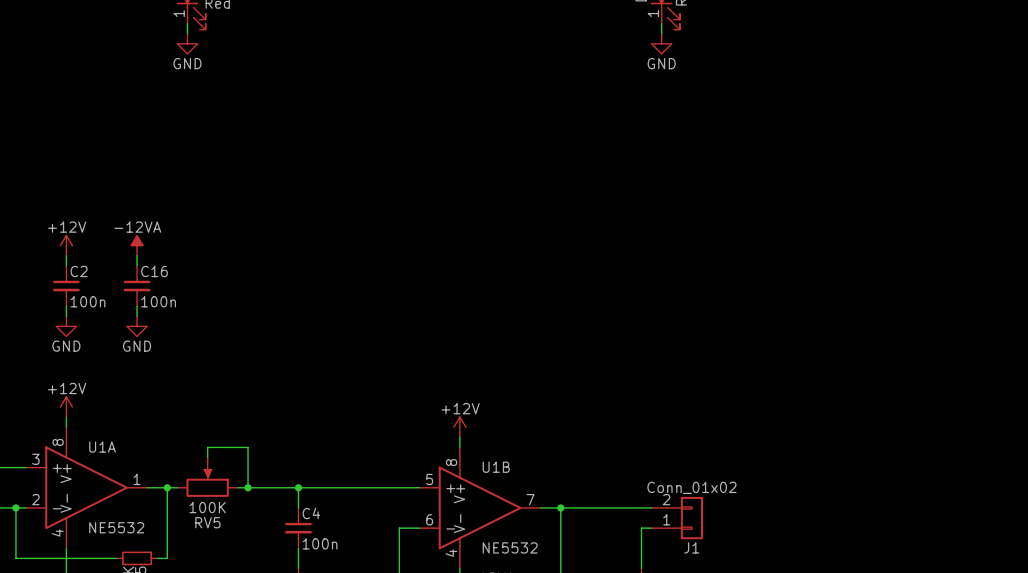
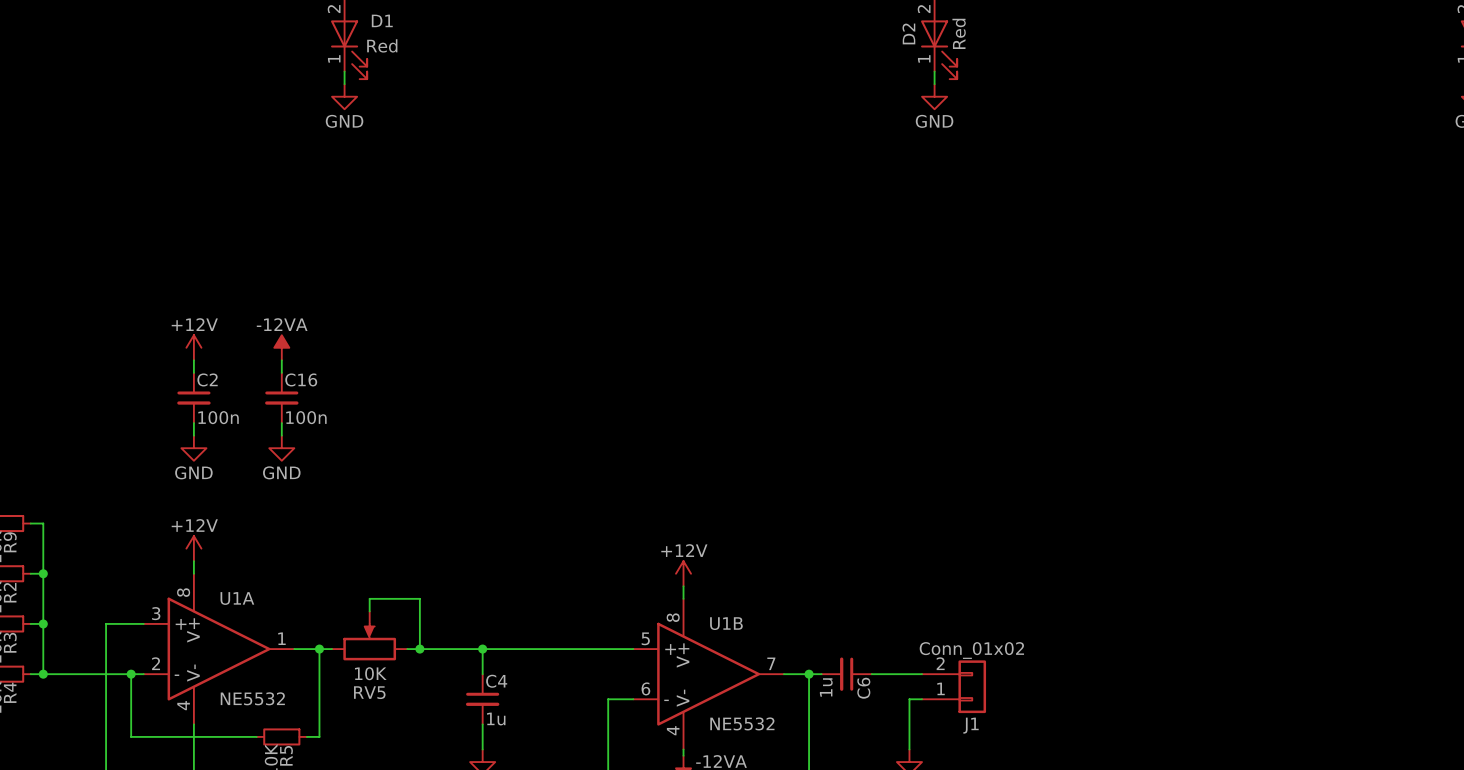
RV5 flip: as is (207, 482) -> left-right (369, 642)
RV5 value: 100K (207, 507) -> 10K (370, 673)
C6: none -> 1u (846, 674)
C4 value: 100n (320, 543) -> 1u (496, 719)

